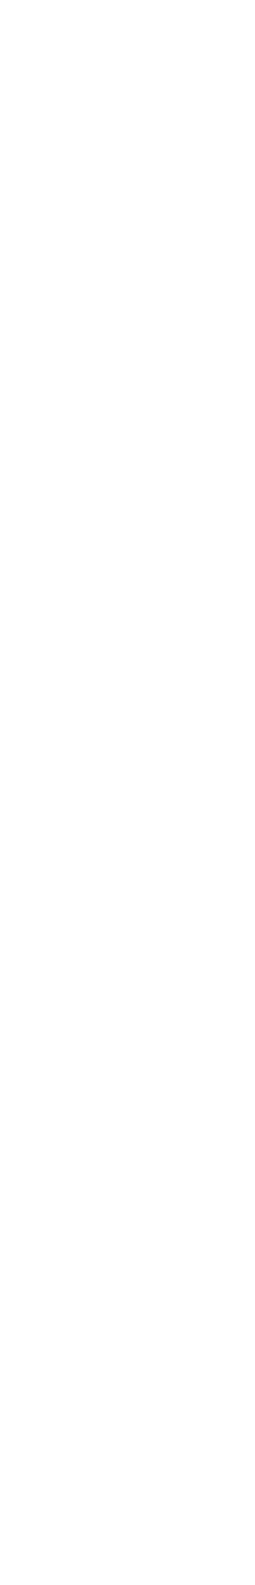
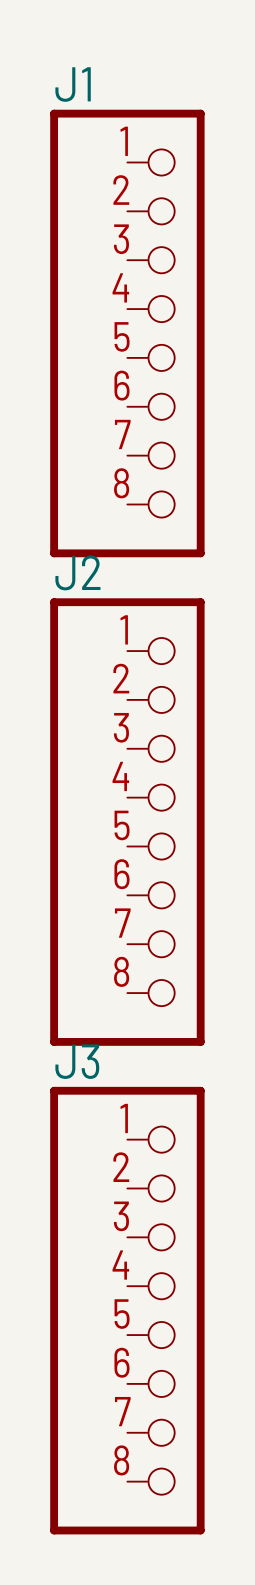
J1: none -> (127, 333)
J2: none -> (127, 822)
J3: none -> (127, 1310)

